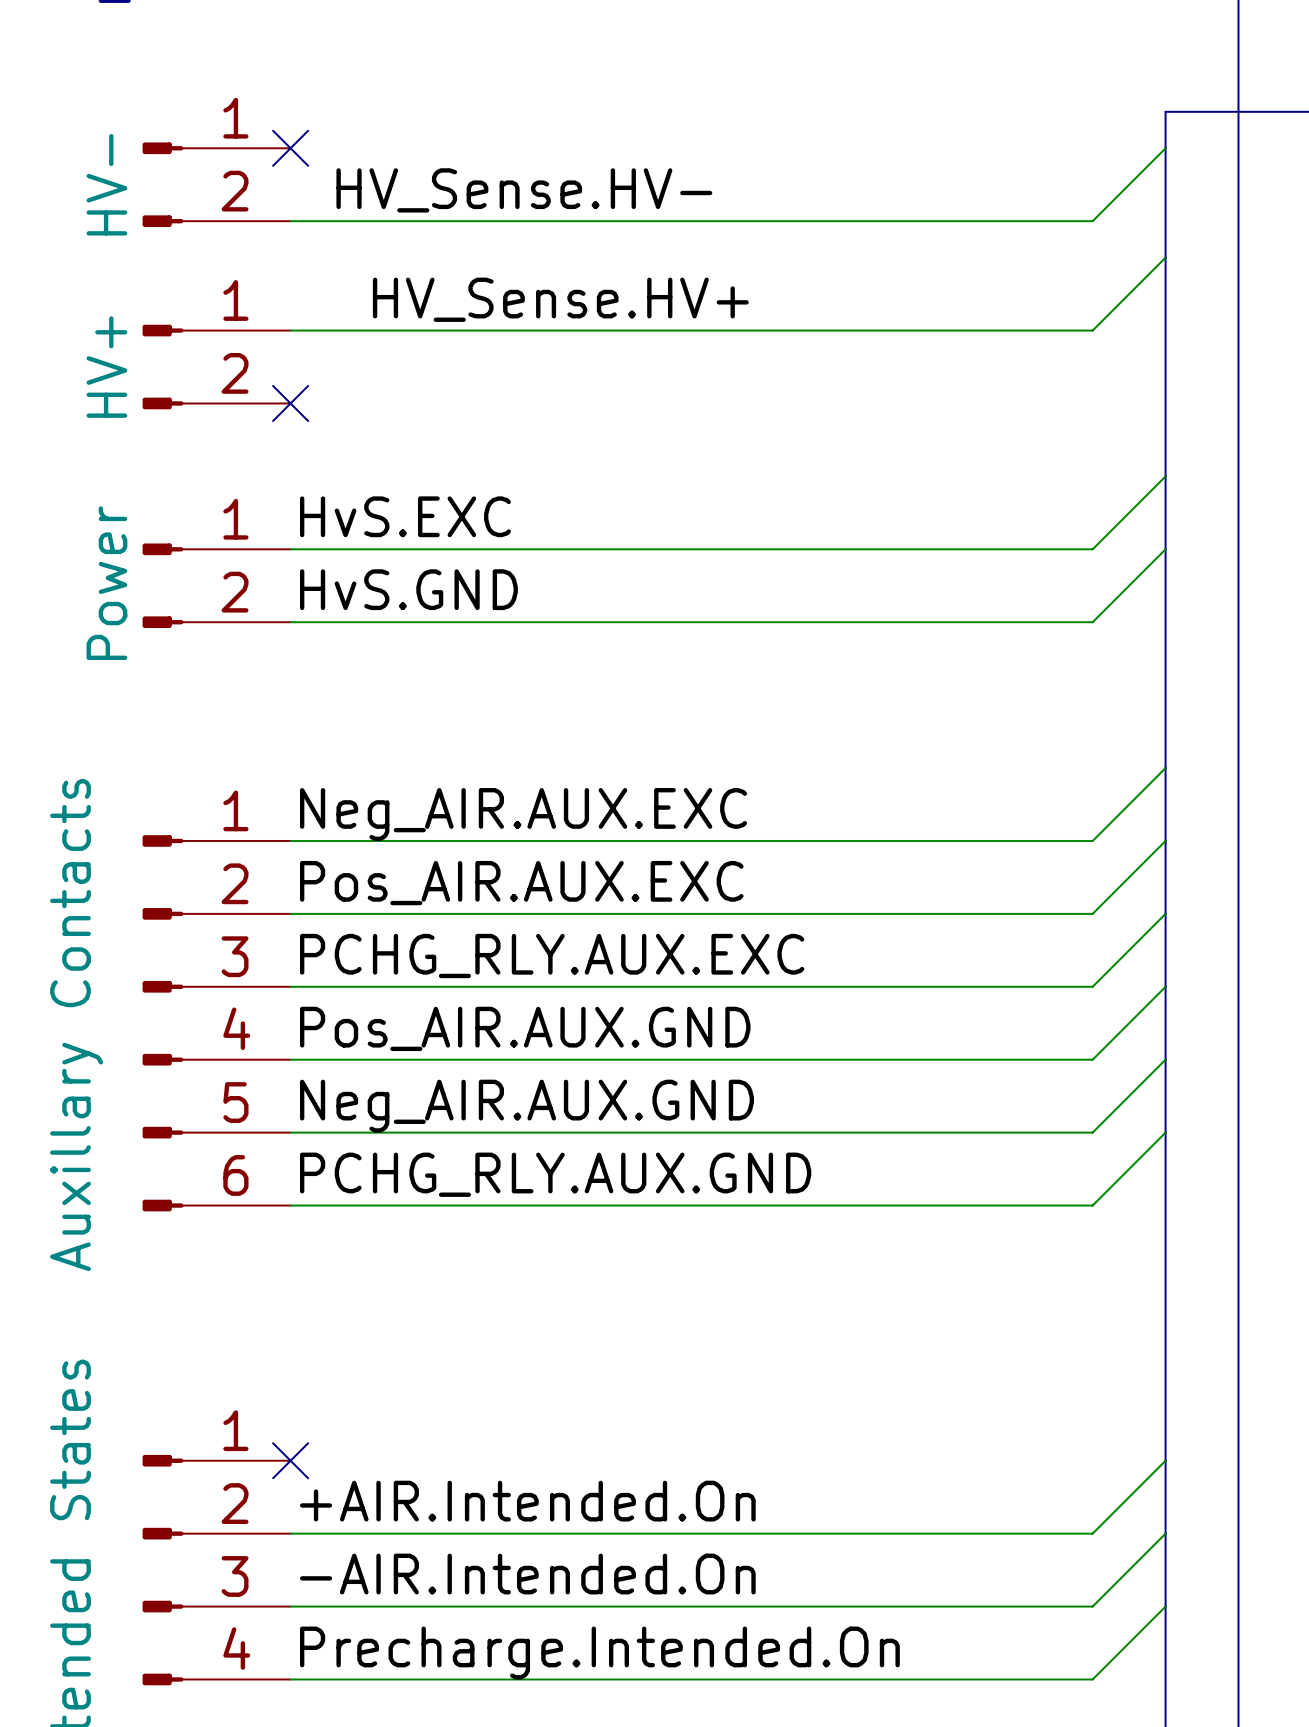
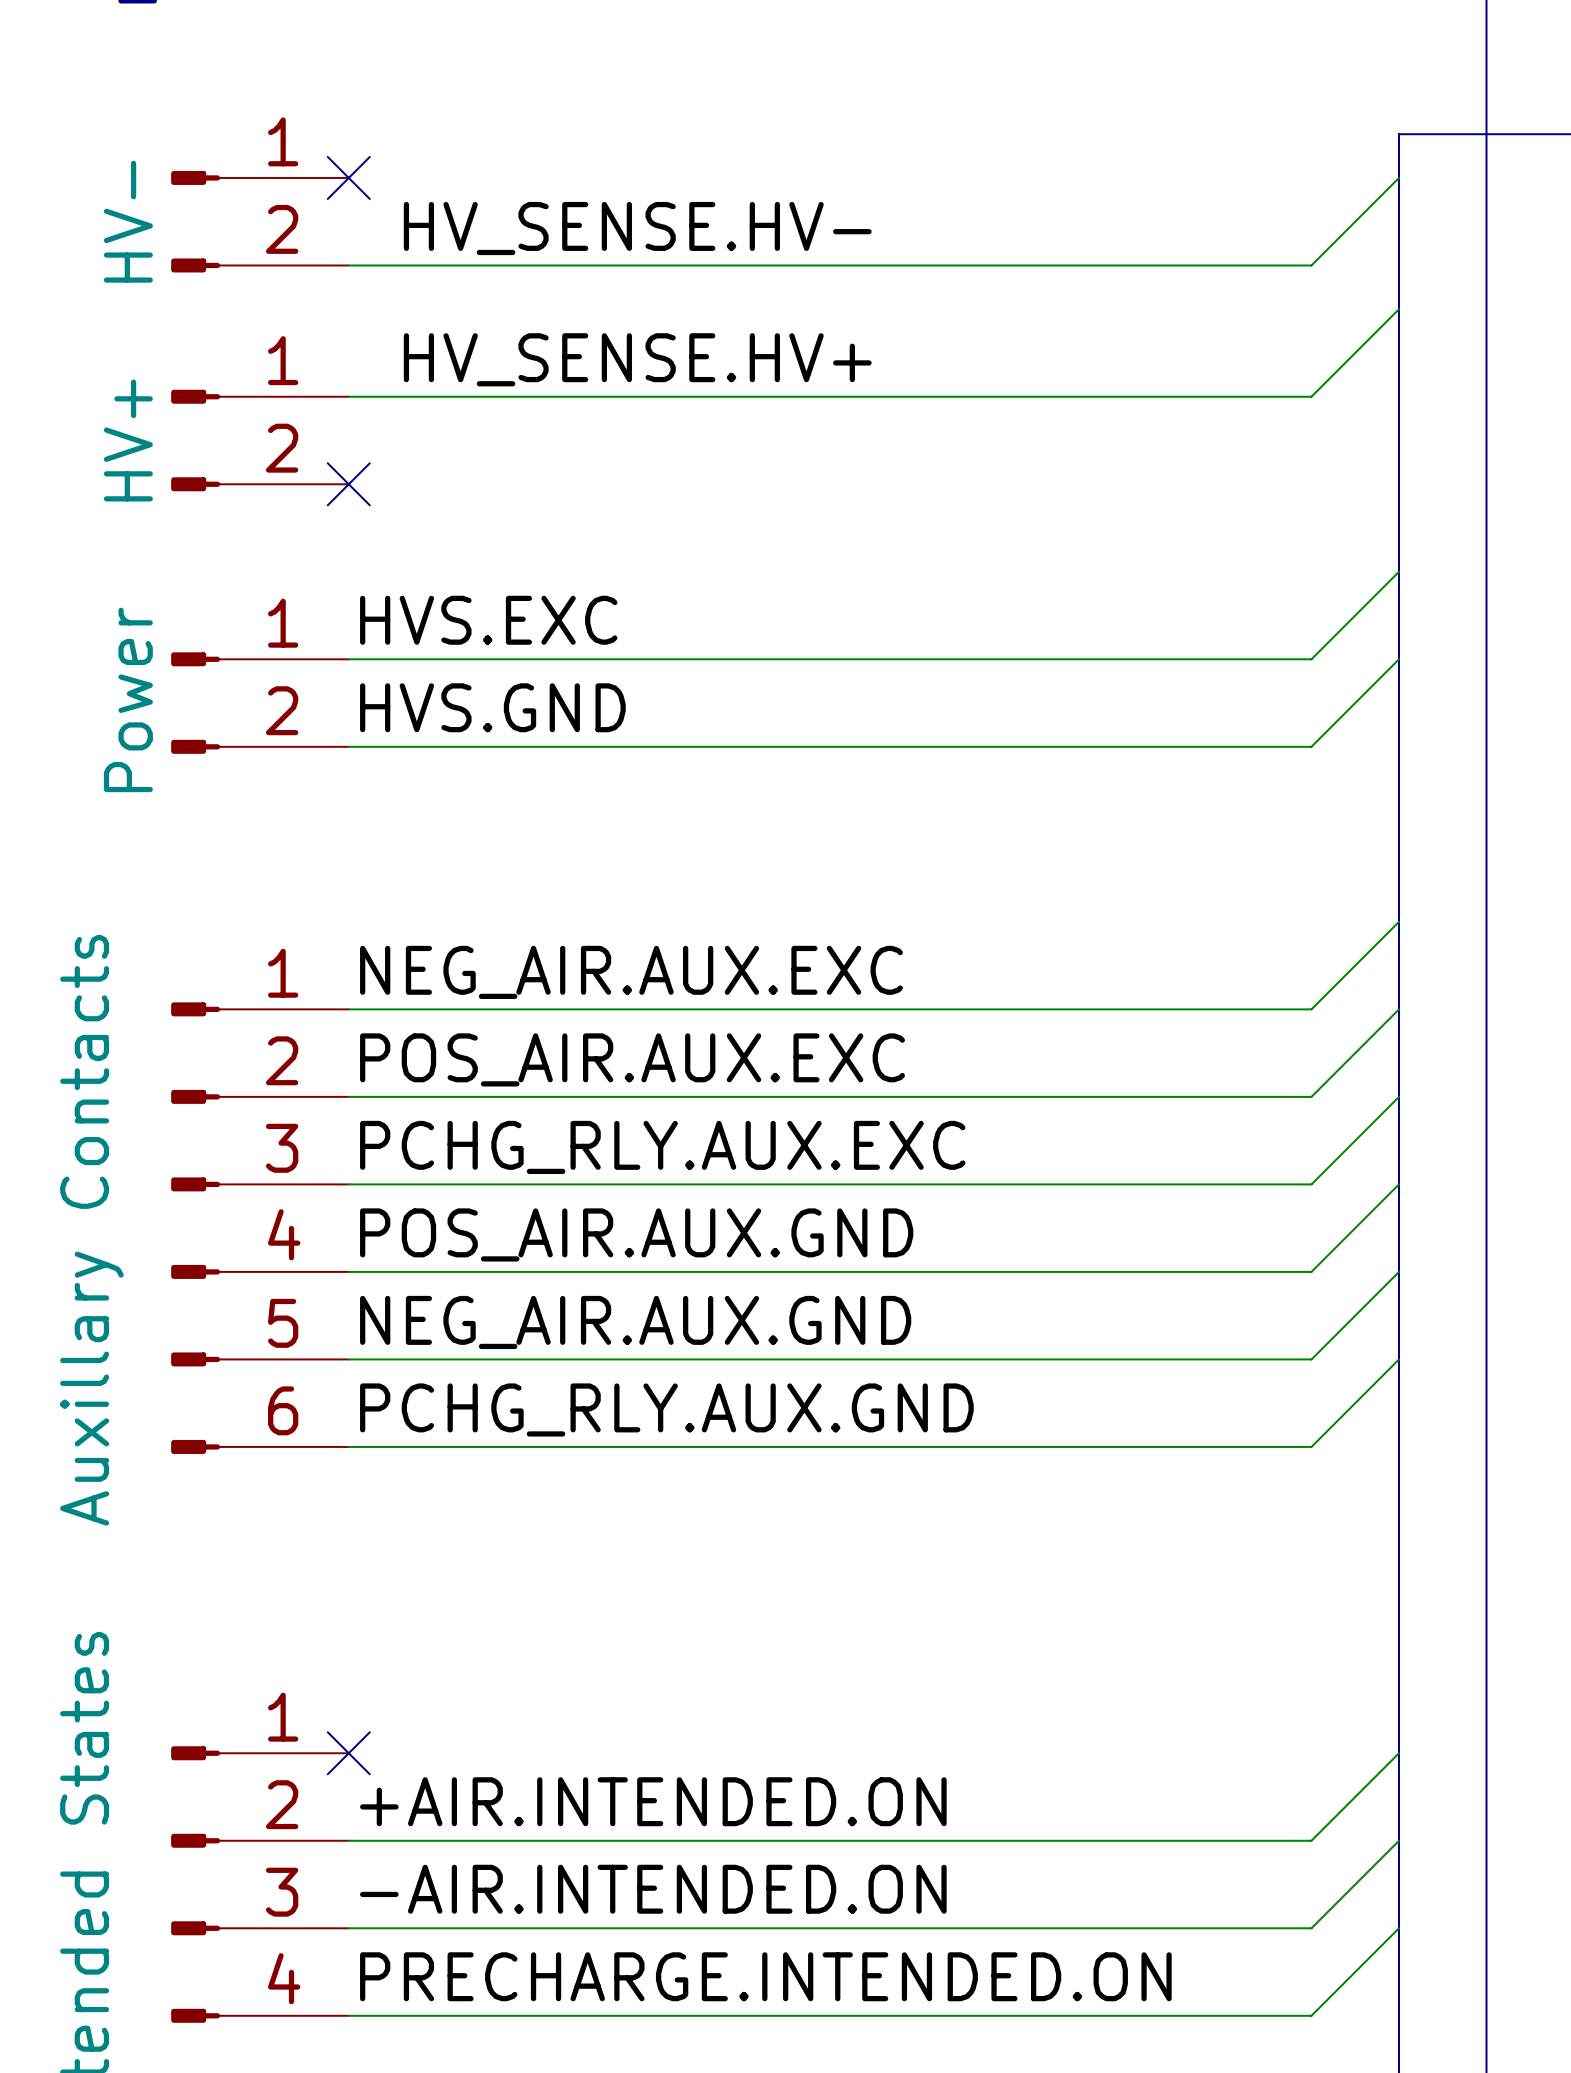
label: HV_Sense.HV- (524, 190) -> HV_SENSE.HV- (637, 228)
label: HV_Sense.HV+ (560, 299) -> HV_SENSE.HV+ (637, 359)
label: HvS.EXC (405, 516) -> HVS.EXC (488, 620)
label: HvS.GND (408, 589) -> HVS.GND (492, 707)
label: Neg_AIR.AUX.EXC (523, 814) -> NEG_AIR.AUX.EXC (631, 972)
label: Pos_AIR.AUX.EXC (521, 883) -> POS_AIR.AUX.EXC (632, 1059)
label: Pos_AIR.AUX.GND (525, 1028) -> POS_AIR.AUX.GND (636, 1234)
label: Neg_AIR.AUX.GND (526, 1106) -> NEG_AIR.AUX.GND (635, 1322)
label: +AIR.Intended.On (527, 1501) -> +AIR.INTENDED.ON (653, 1801)
label: -AIR.Intended.On (527, 1574) -> -AIR.INTENDED.ON (653, 1889)
label: Precharge.Intended.On (599, 1653) -> PRECHARGE.INTENDED.ON (765, 1976)

